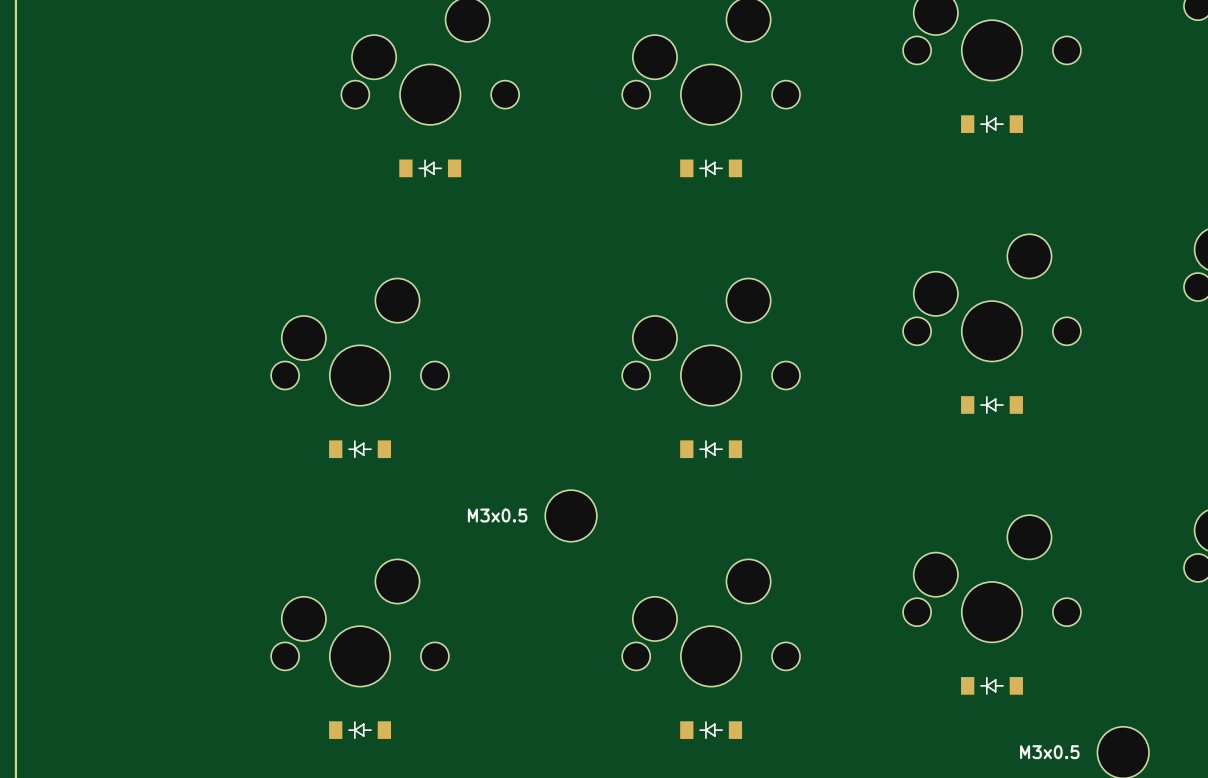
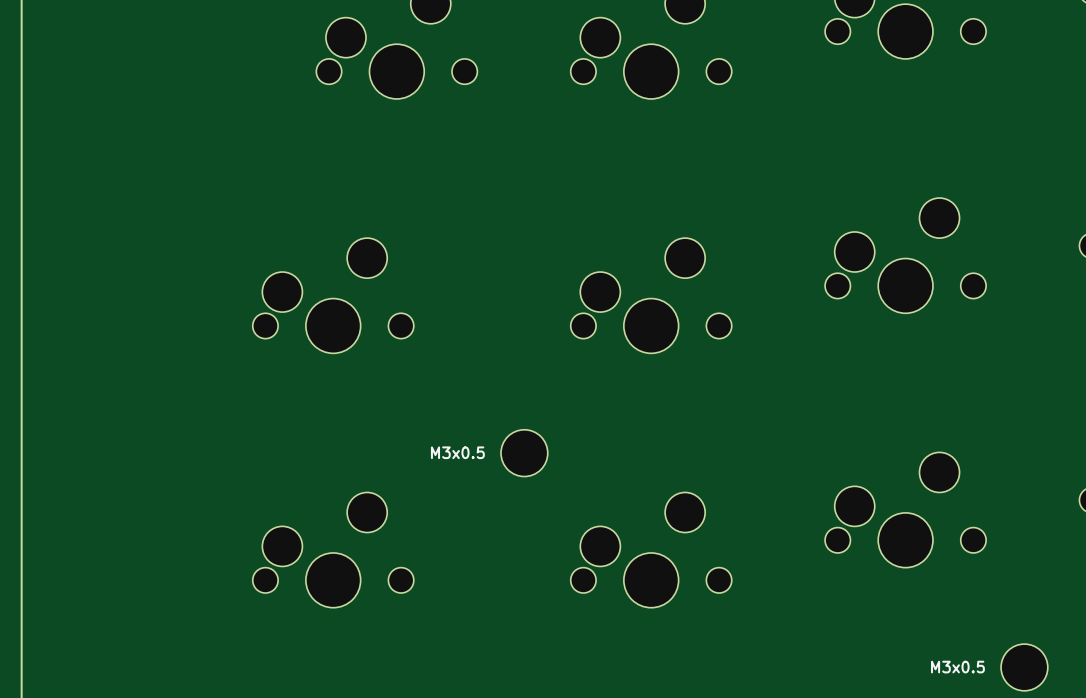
part: (992, 124) -> none
part: (430, 168) -> none
part: (711, 168) -> none
part: (992, 405) -> none
part: (360, 449) -> none
part: (711, 449) -> none
part: (992, 685) -> none
part: (360, 730) -> none
part: (711, 730) -> none

